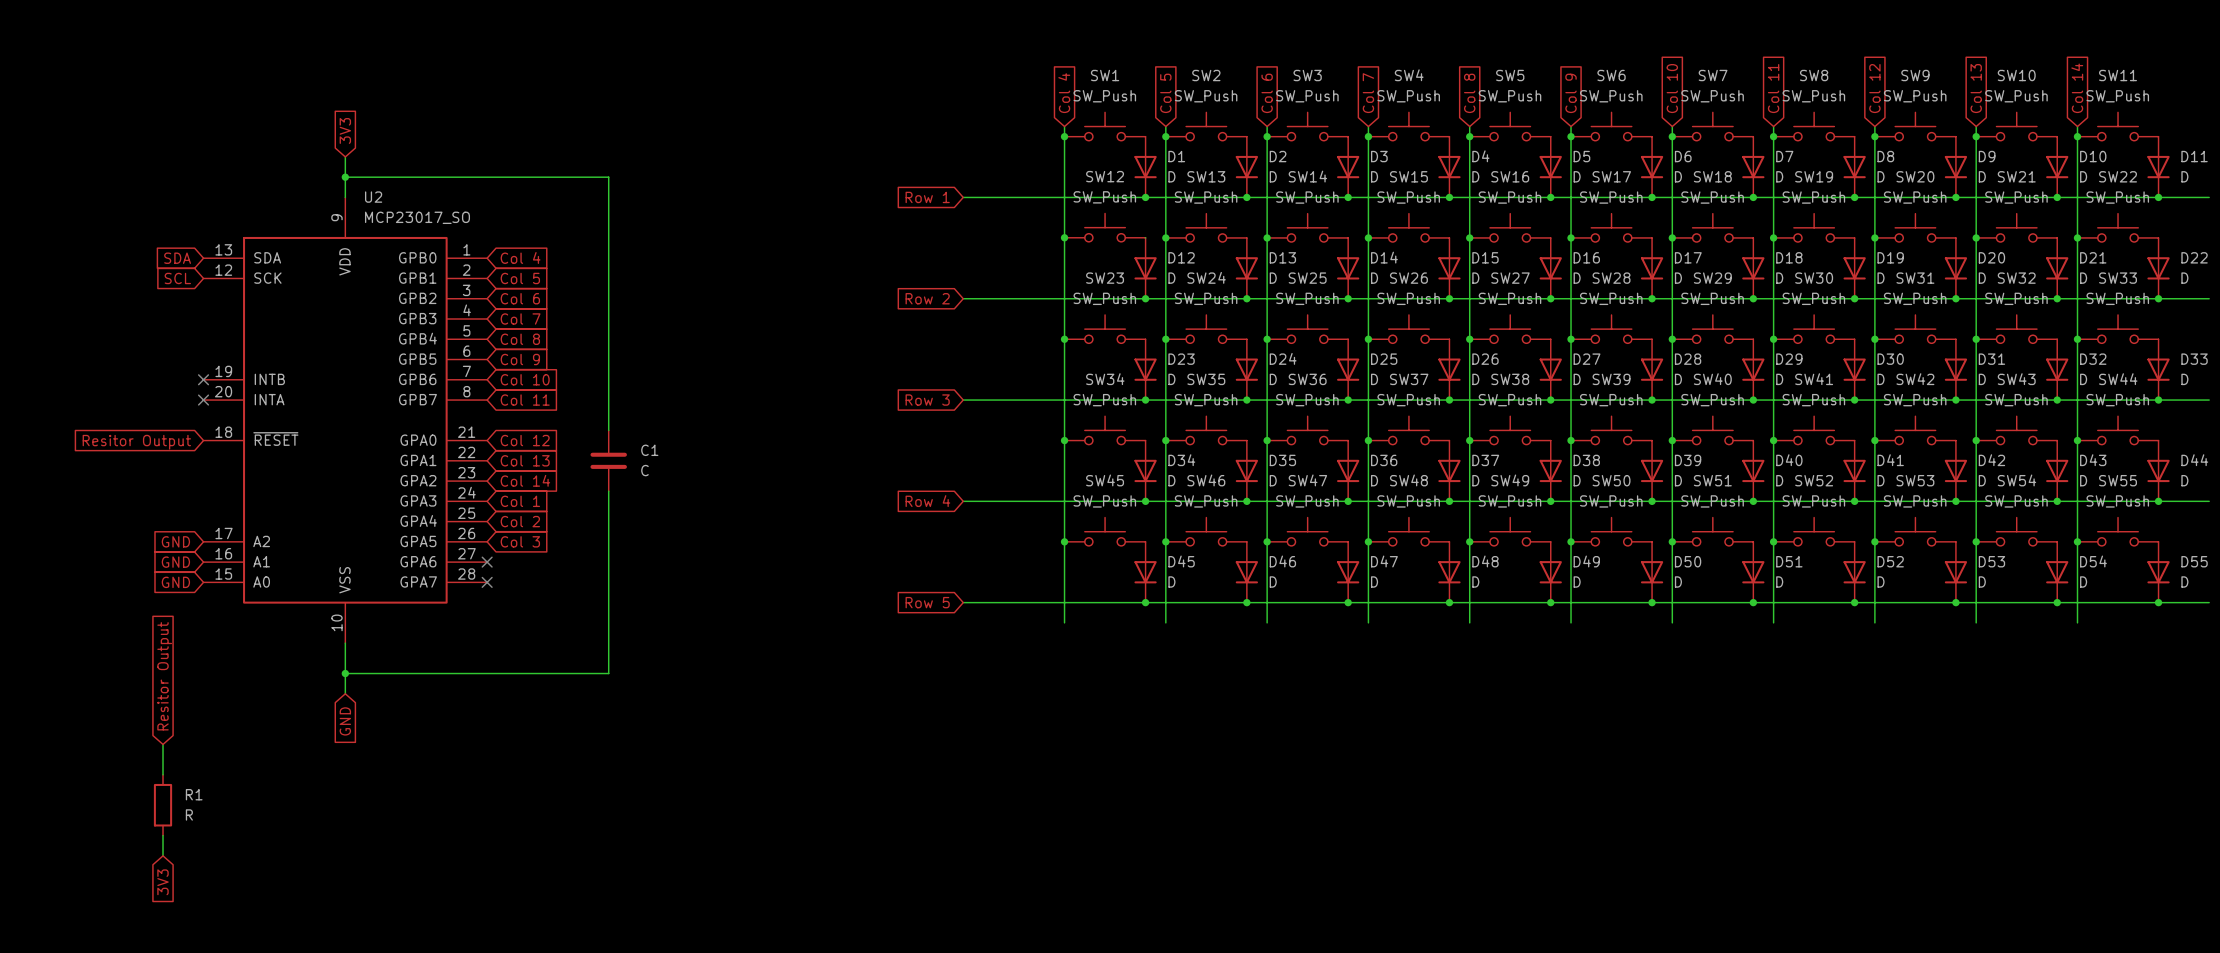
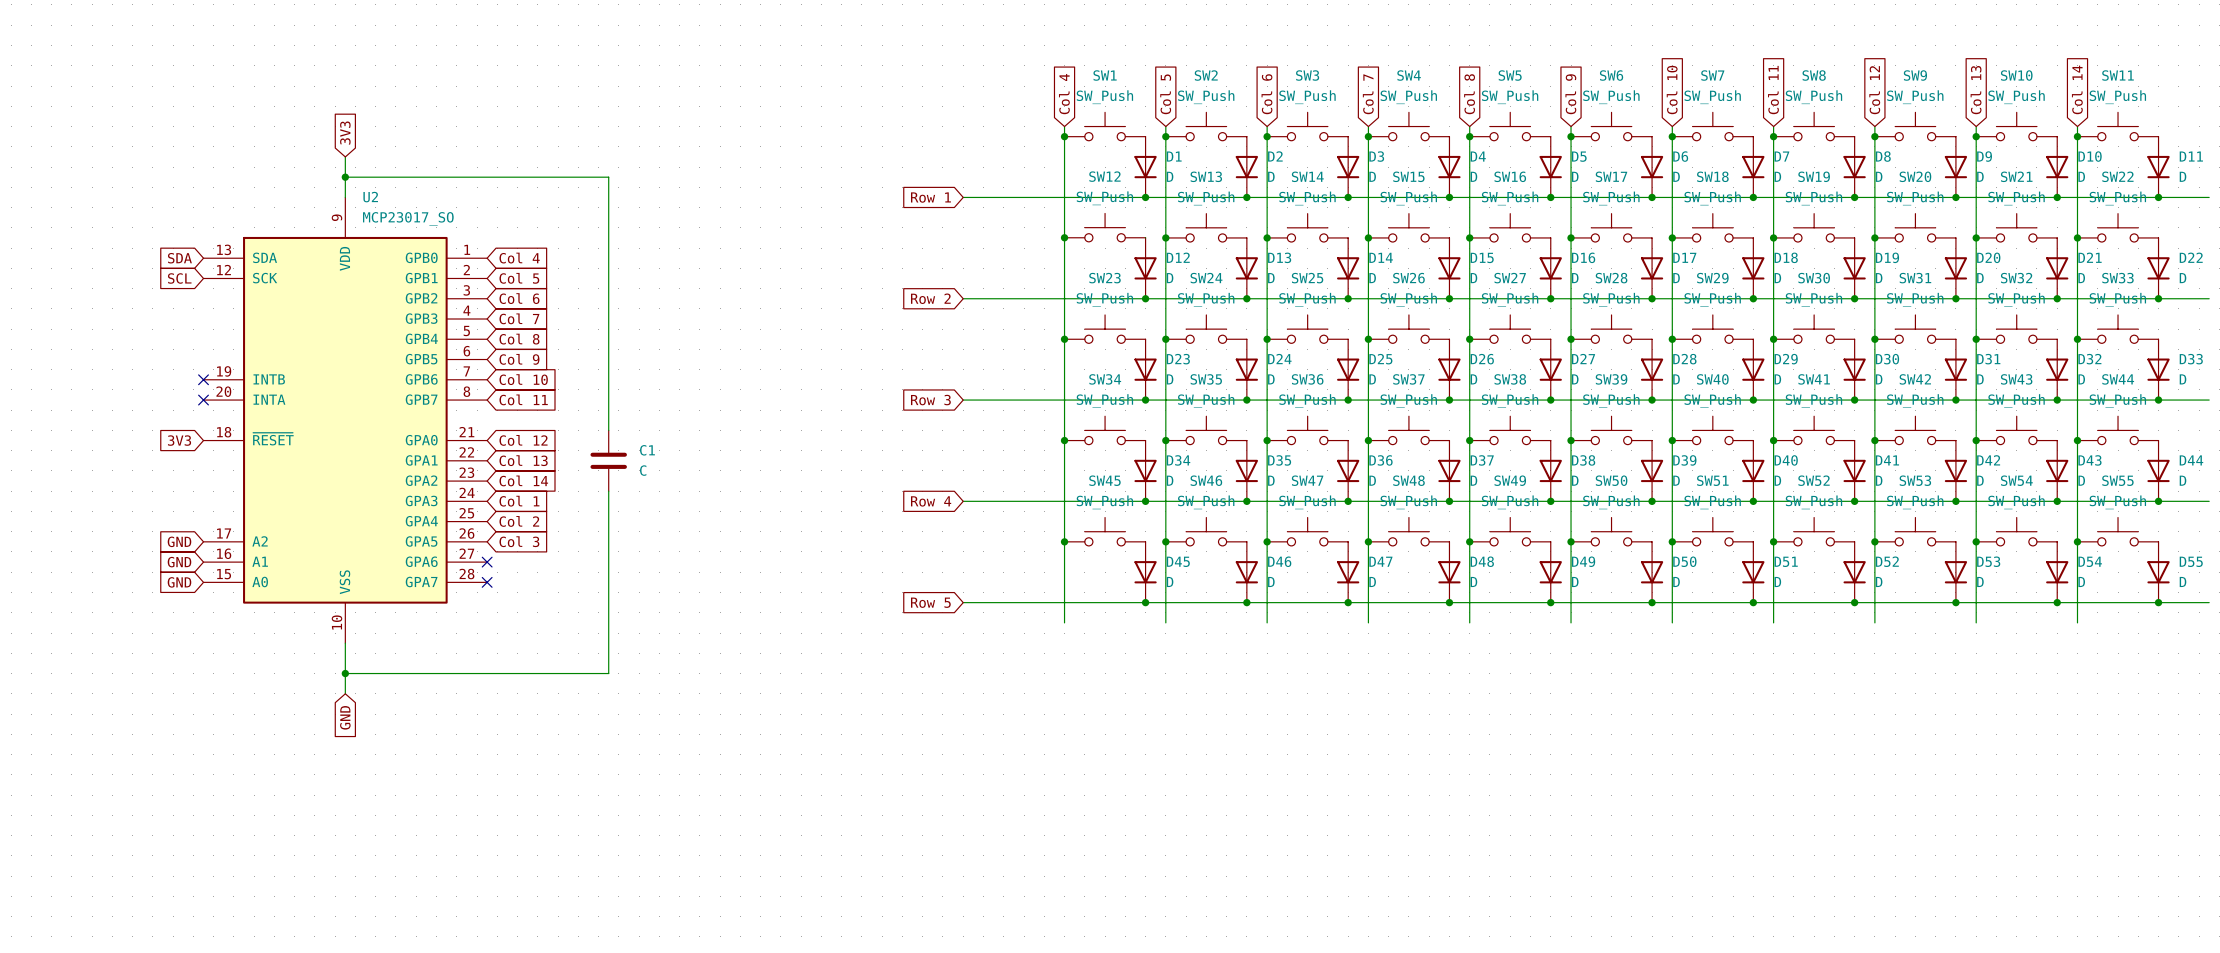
global label: Resitor Output (136, 442) -> 3V3 (179, 440)
global label: Resitor Output (164, 676) -> none
wire: (163, 744) (163, 774) -> none
R1: R (163, 805) -> none
wire: (163, 835) (163, 855) -> none
global label: 3V3 (163, 882) -> none

